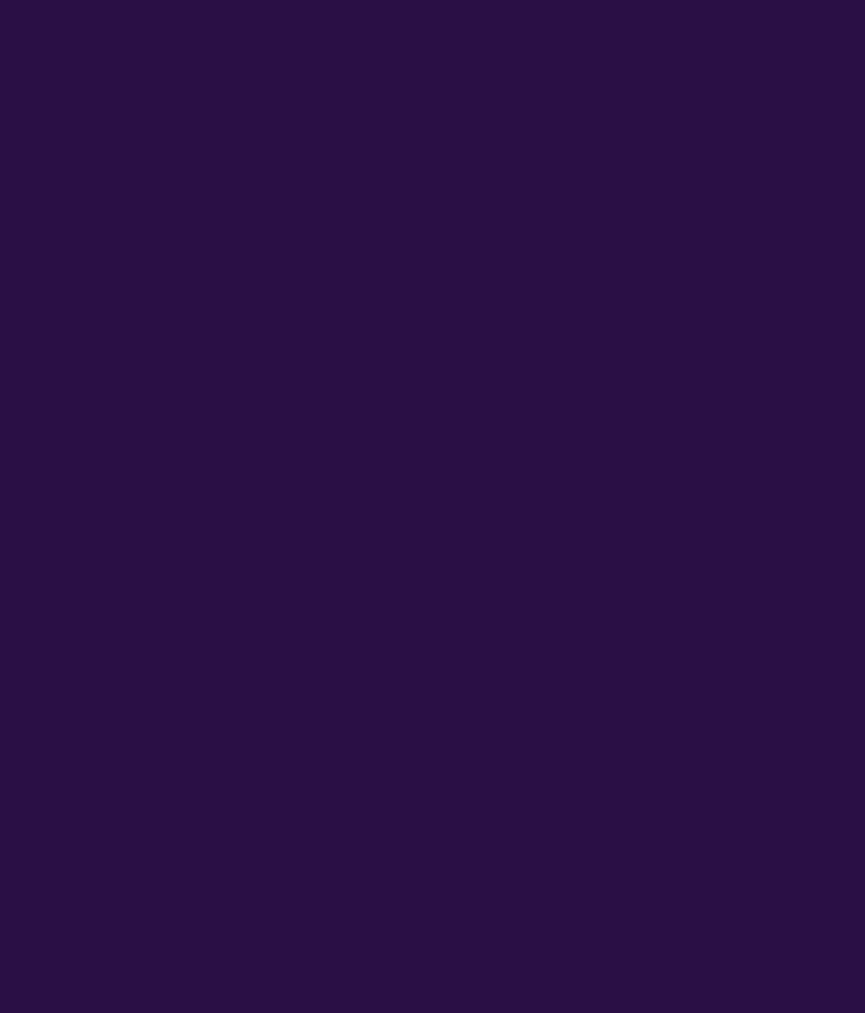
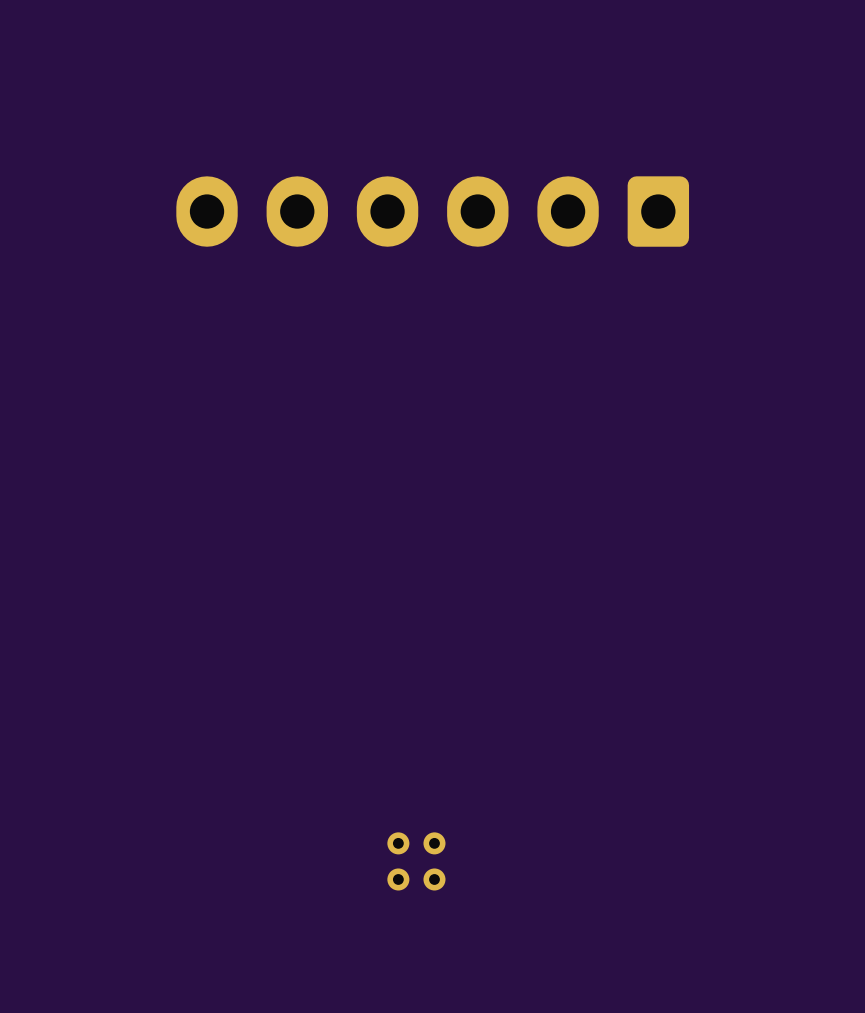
part: none -> (432, 211)
part: none -> (416, 861)

